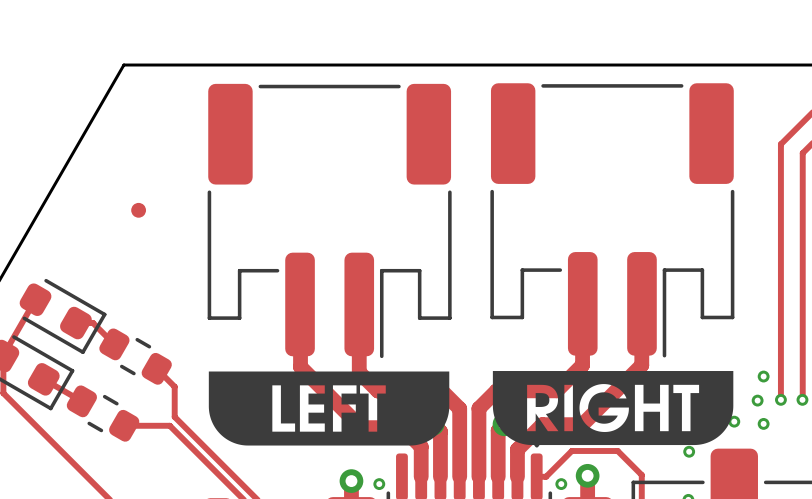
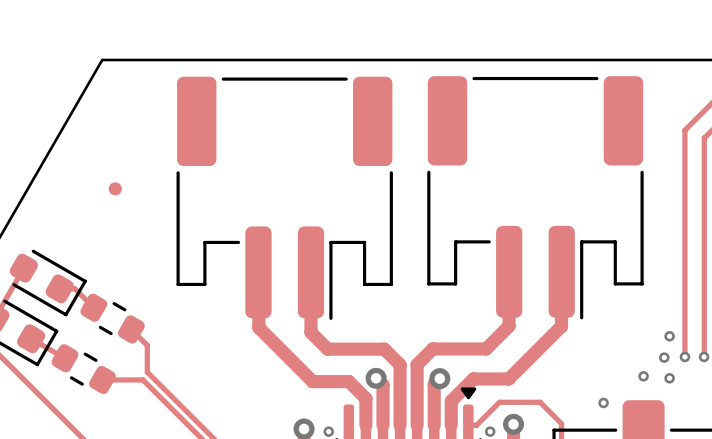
drawing: [208, 371, 450, 446] -> none
drawing: [492, 371, 734, 446] -> none

